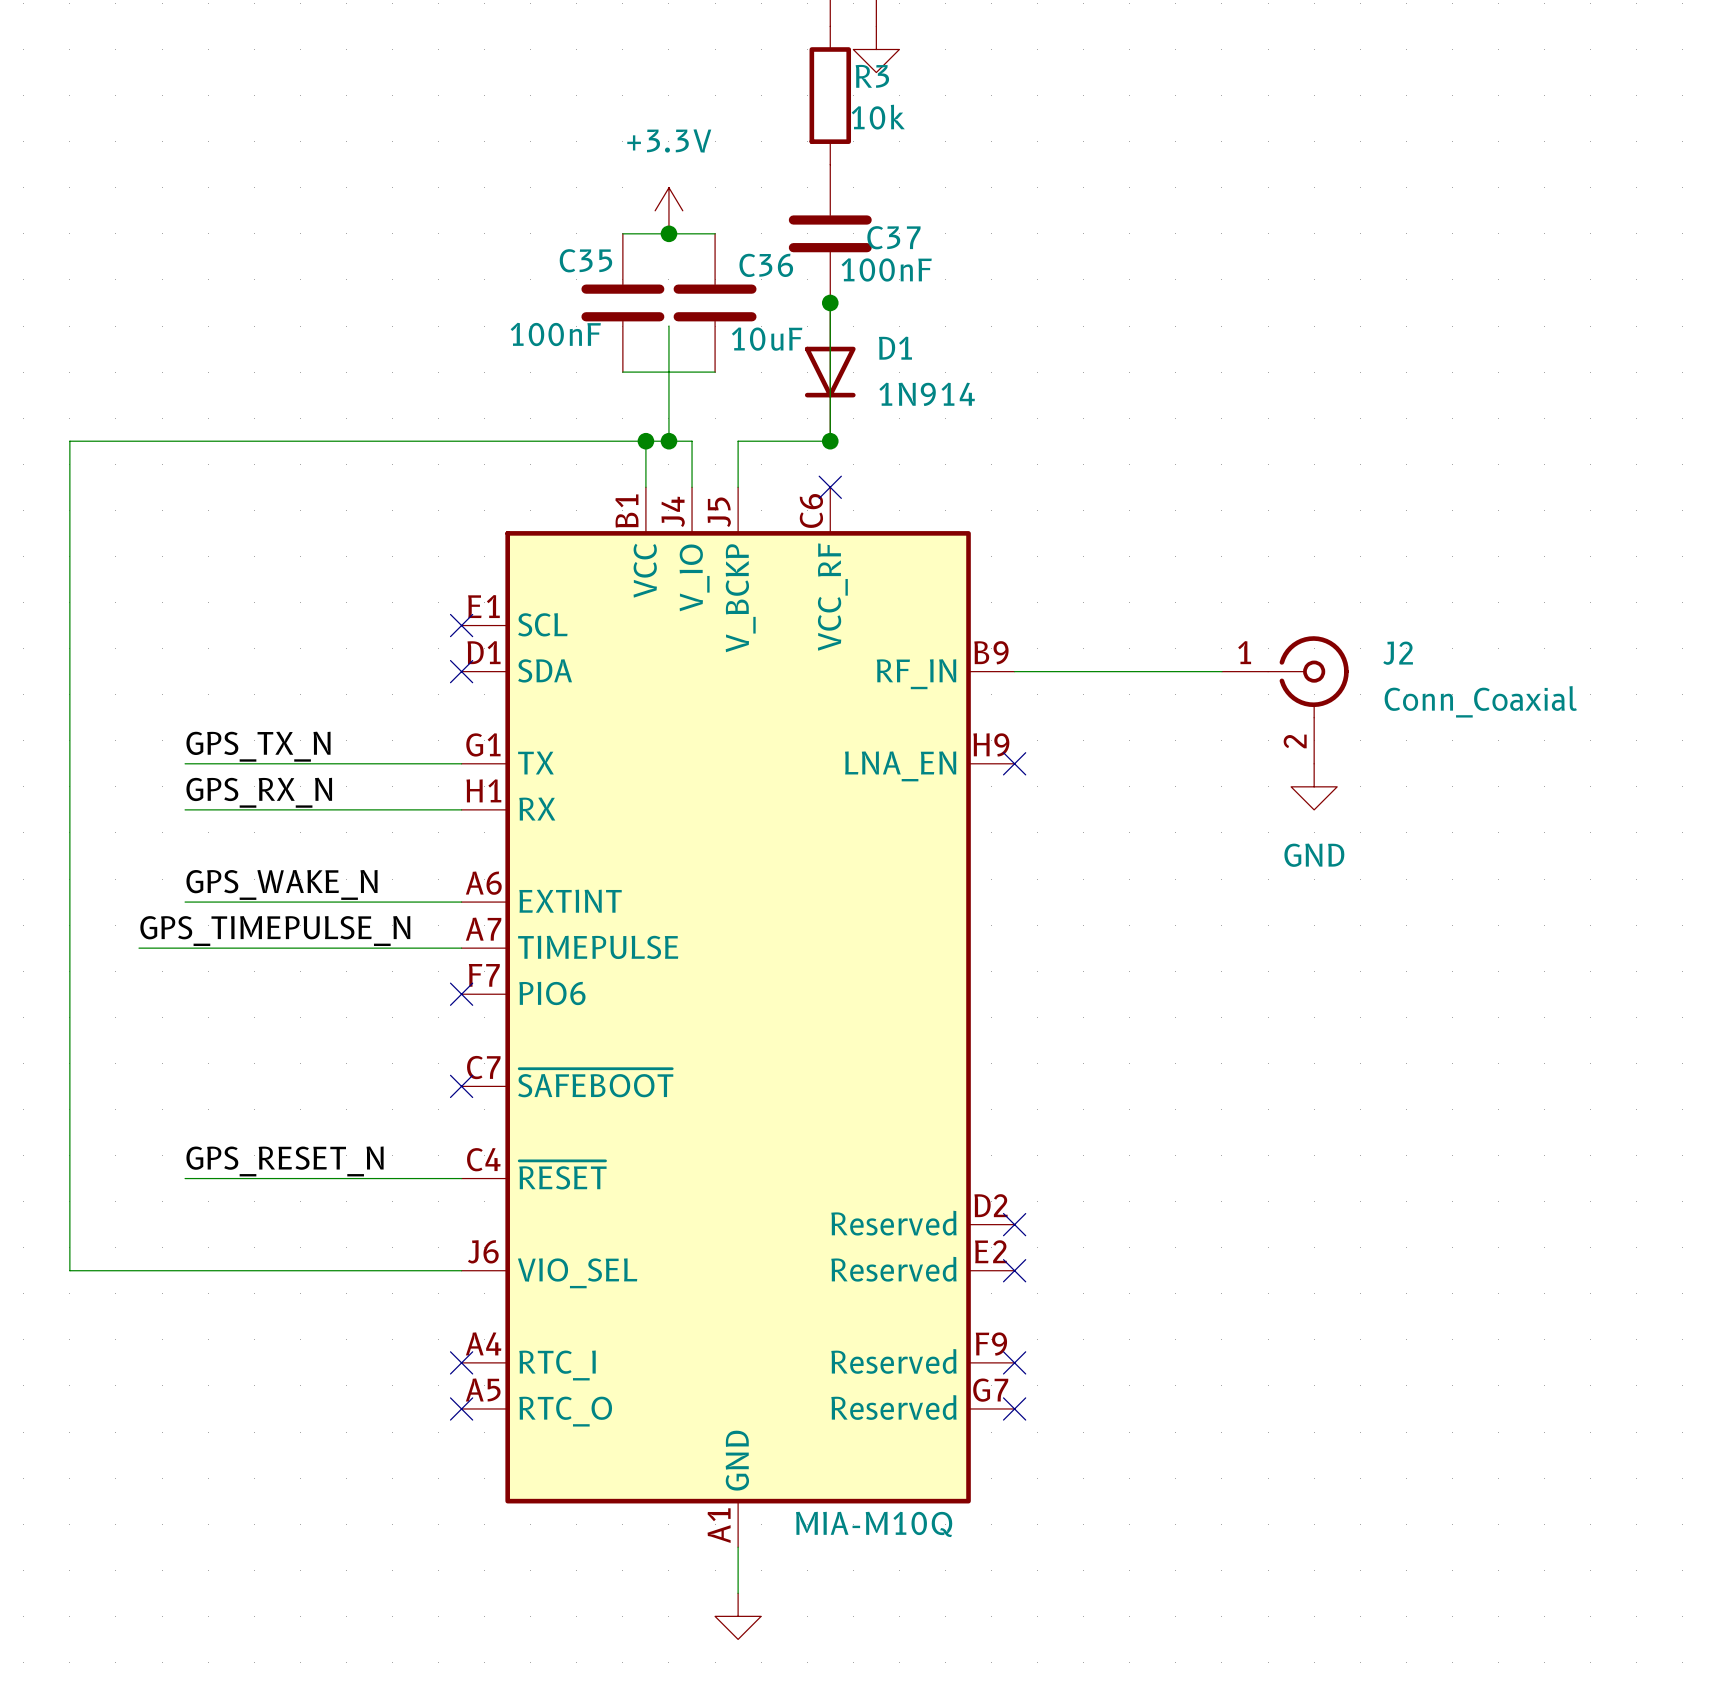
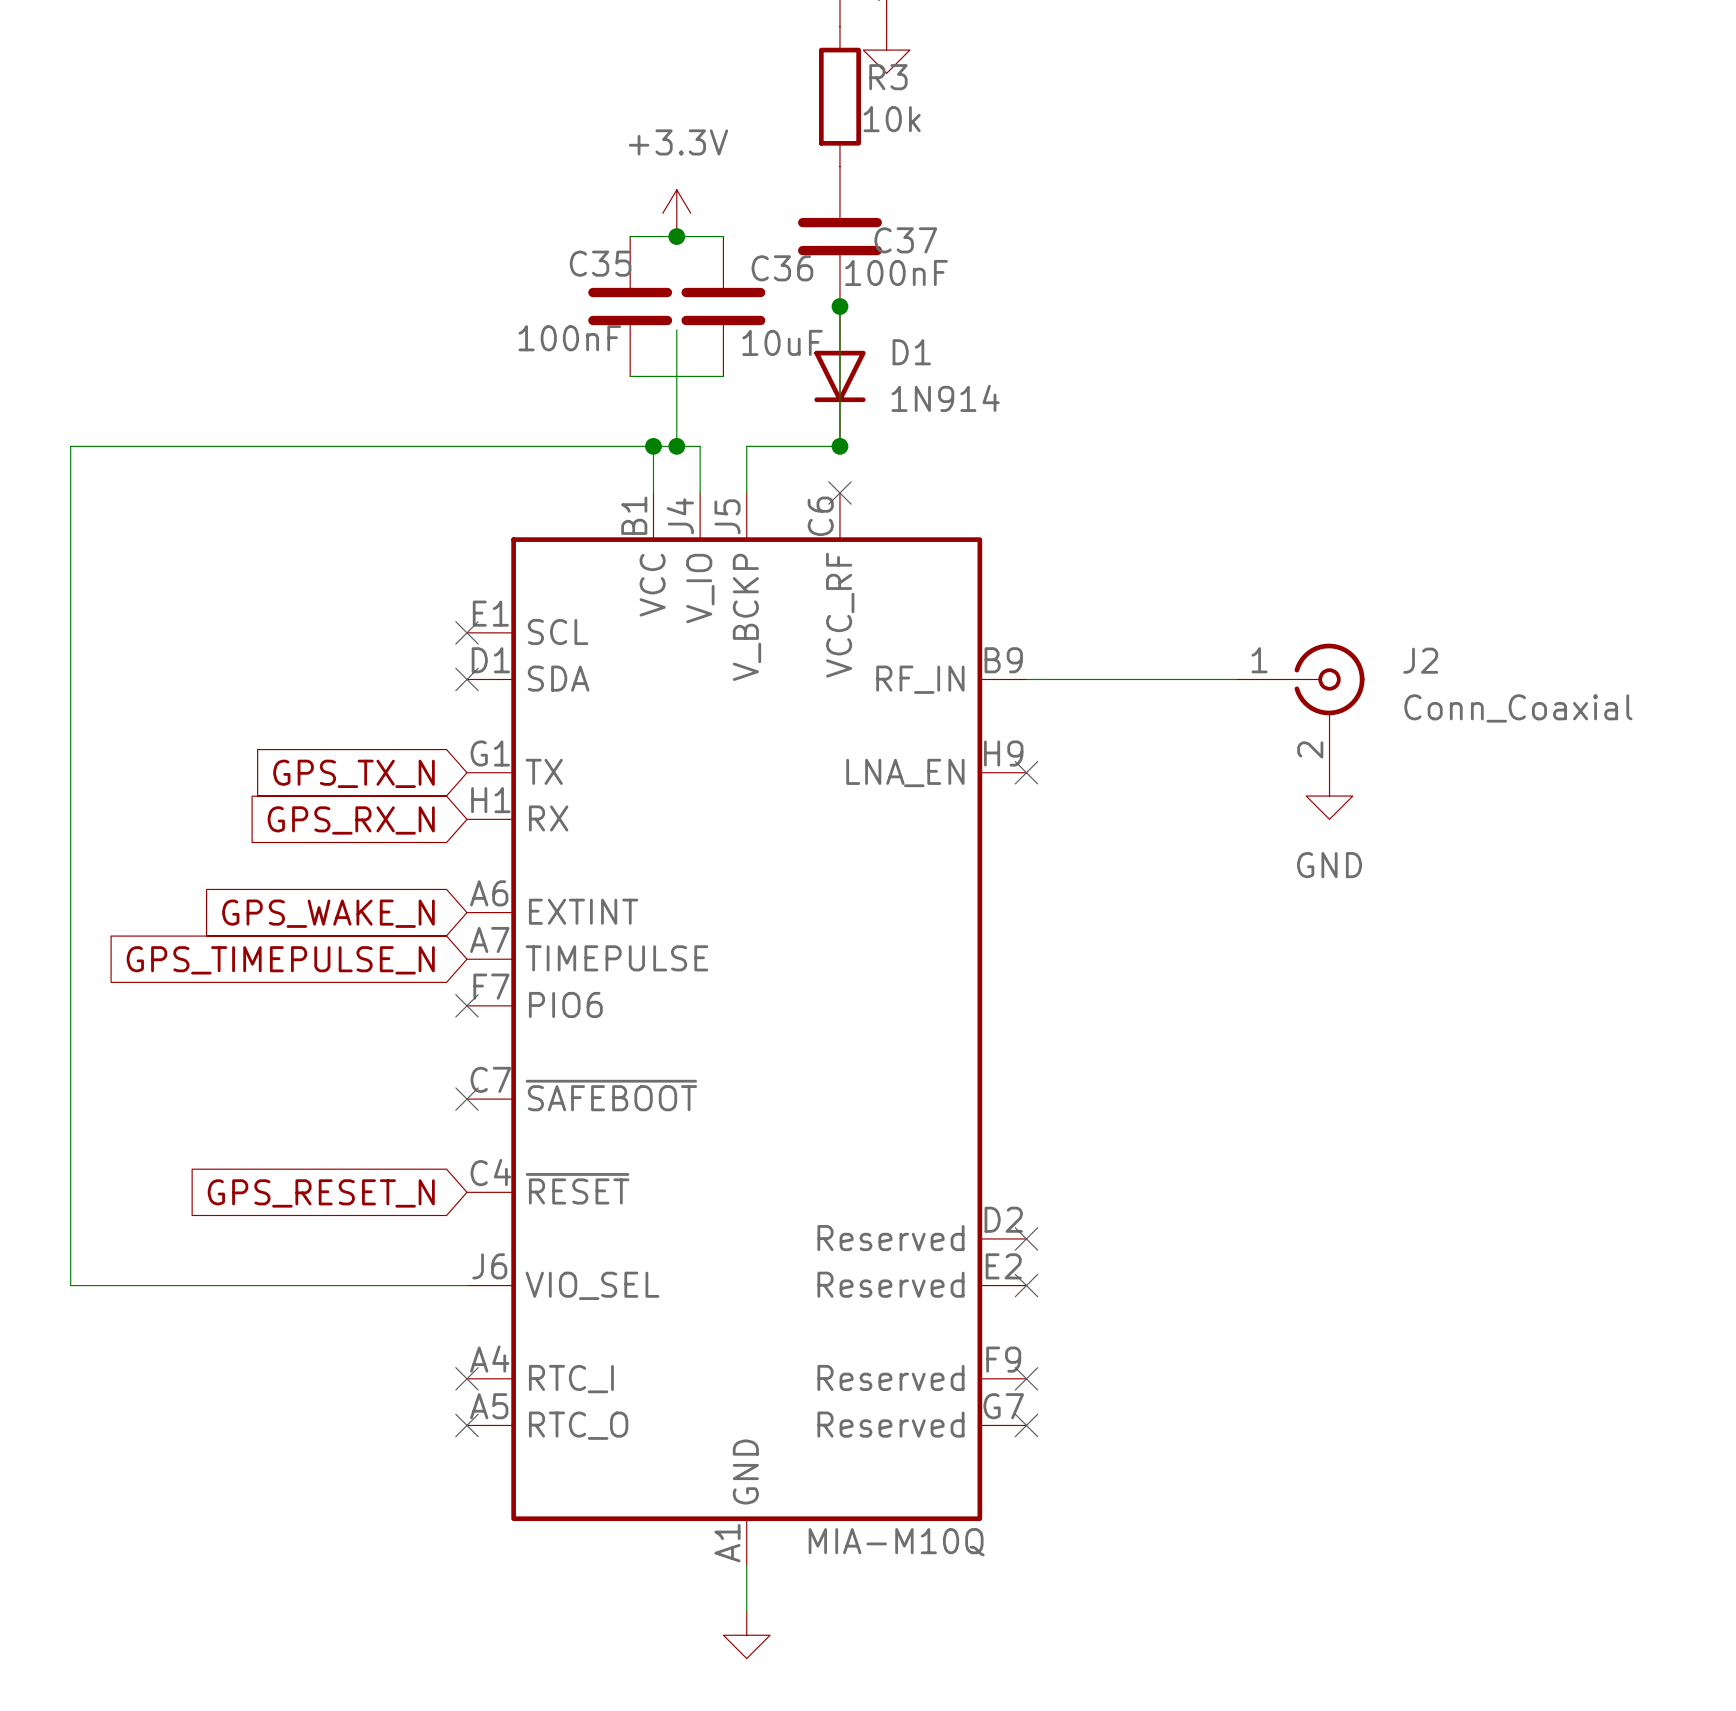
label: GPS_TX_N (258, 746) -> none
wire: (185, 763) (461, 763) -> none
global label: none -> GPS_TX_N (354, 773)
label: GPS_RX_N (259, 792) -> none
wire: (185, 809) (461, 809) -> none
global label: none -> GPS_RX_N (351, 820)
label: GPS_WAKE_N (281, 884) -> none
wire: (185, 902) (461, 902) -> none
global label: none -> GPS_WAKE_N (328, 913)
label: GPS_TIMEPULSE_N (275, 931) -> none
wire: (139, 948) (461, 948) -> none
global label: none -> GPS_TIMEPULSE_N (280, 960)
label: GPS_RESET_N (285, 1161) -> none
wire: (185, 1178) (461, 1178) -> none
global label: none -> GPS_RESET_N (321, 1193)

